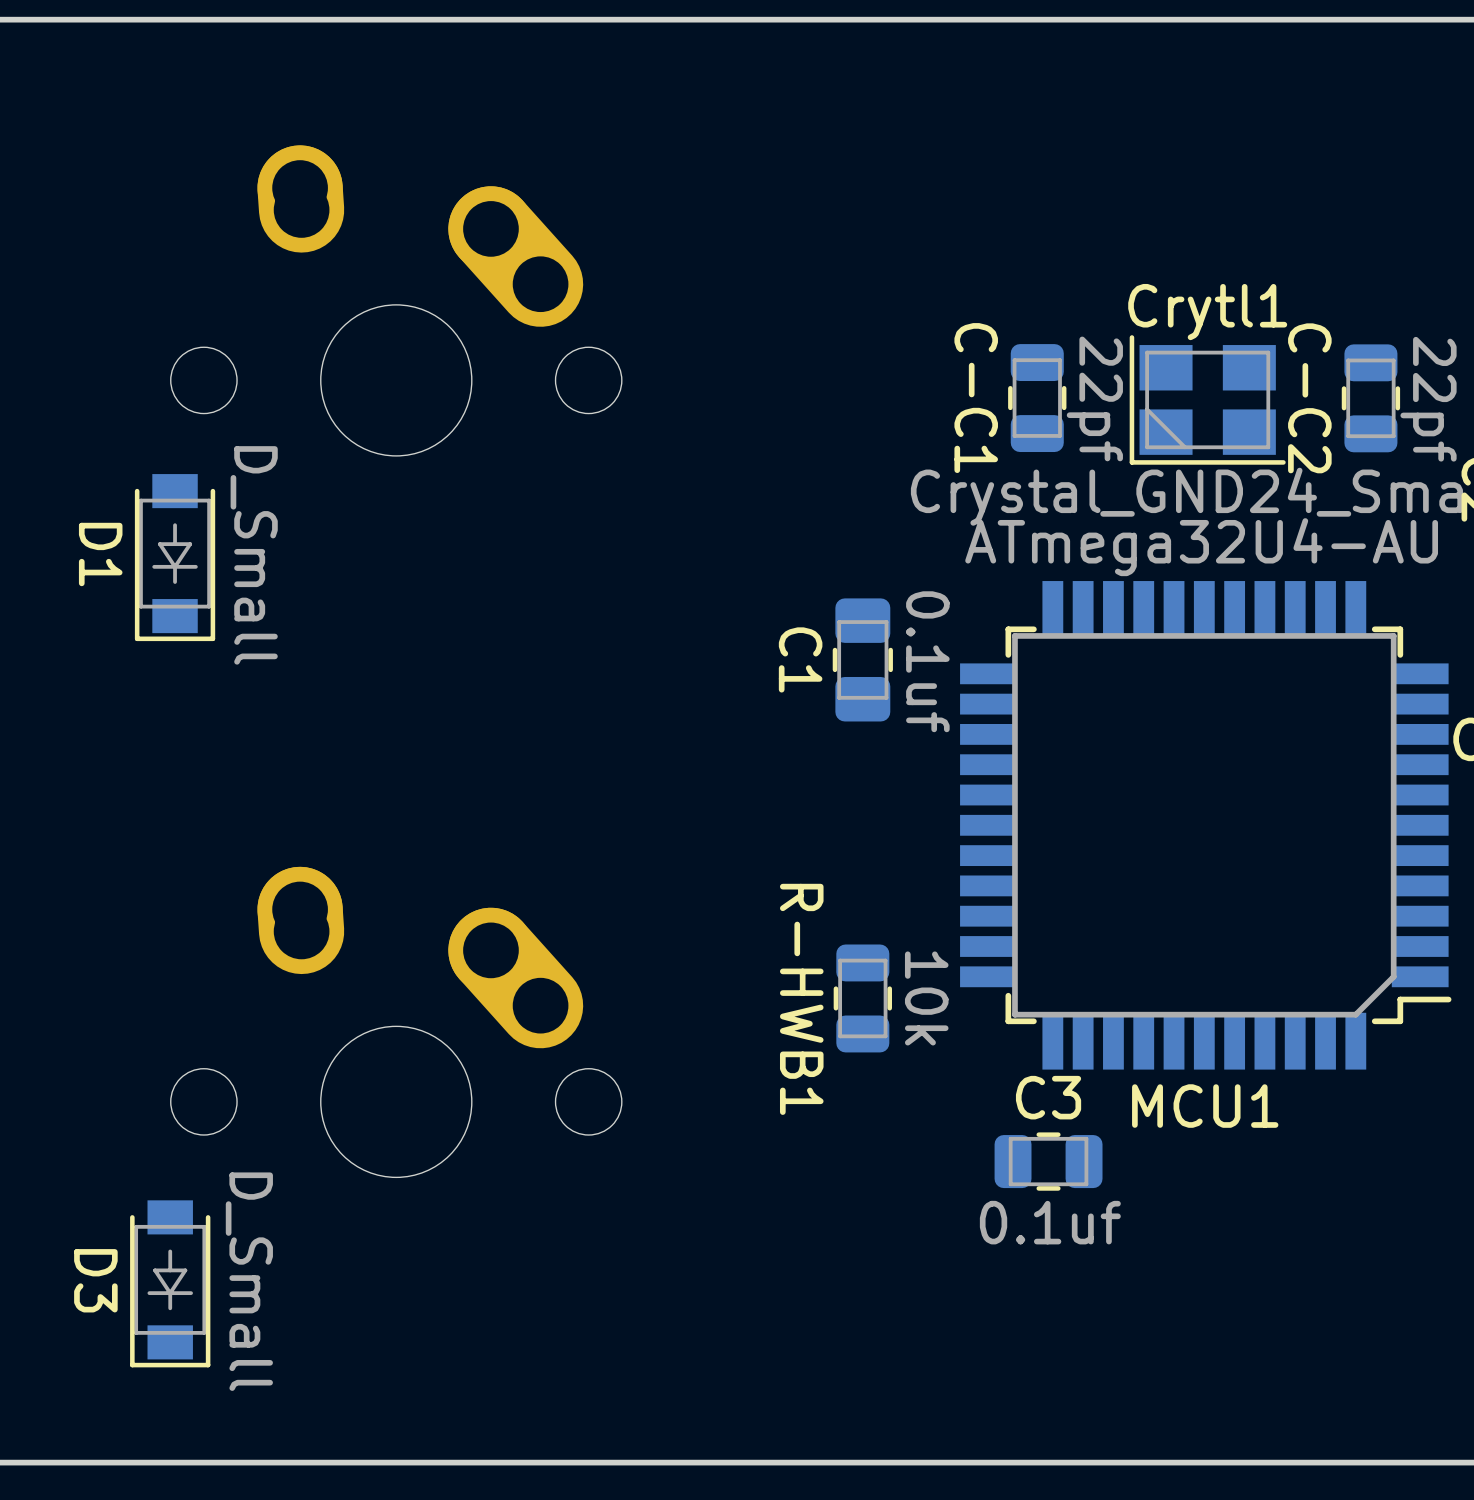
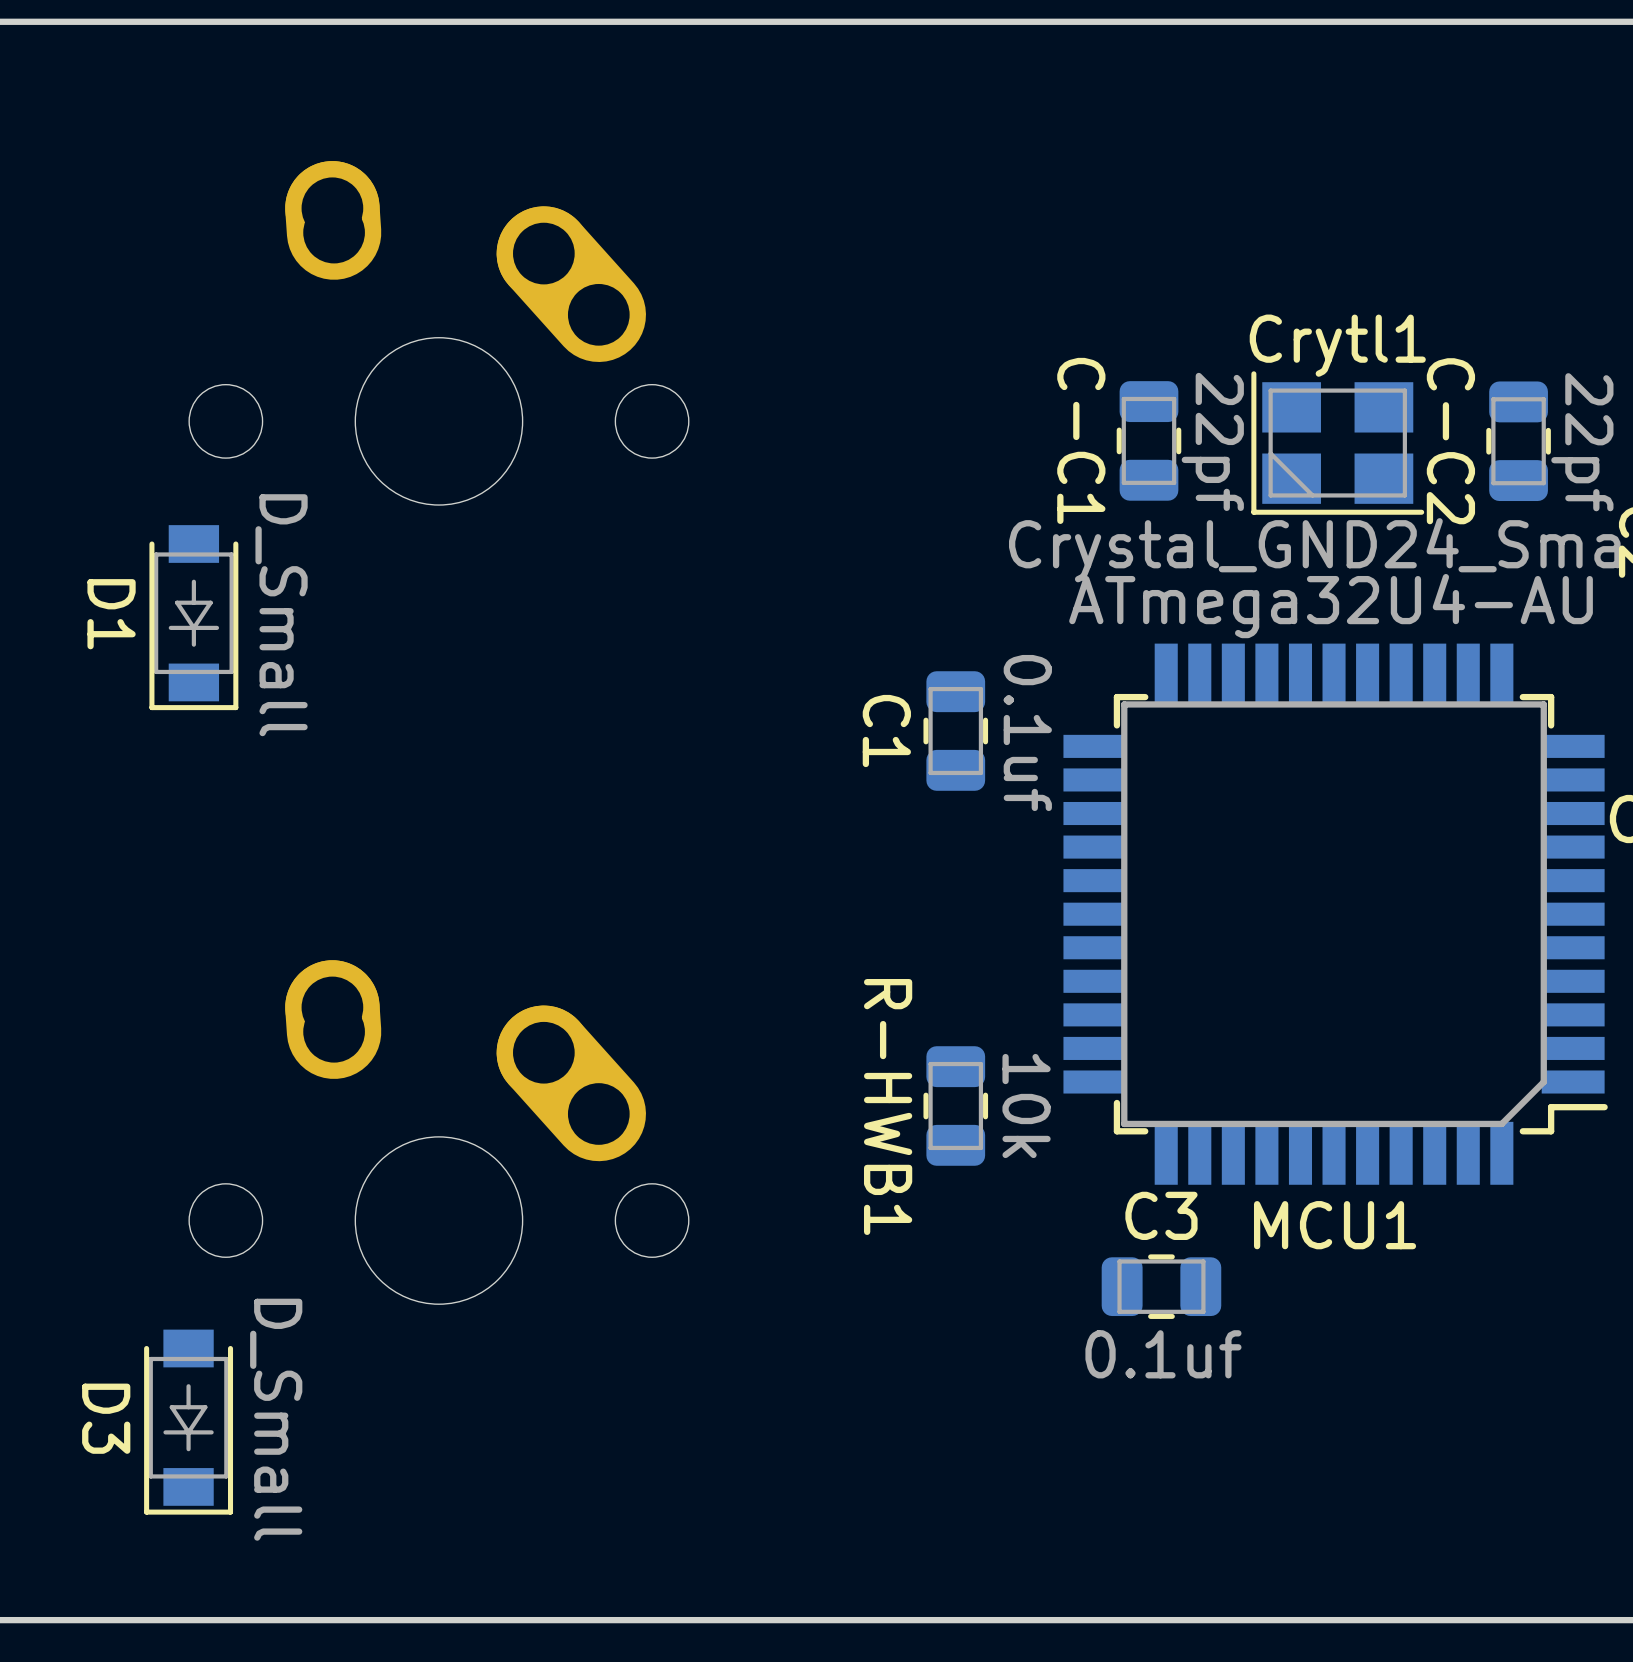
C1 footprint: [832, 598, 893, 722] -> [923, 671, 989, 791]

